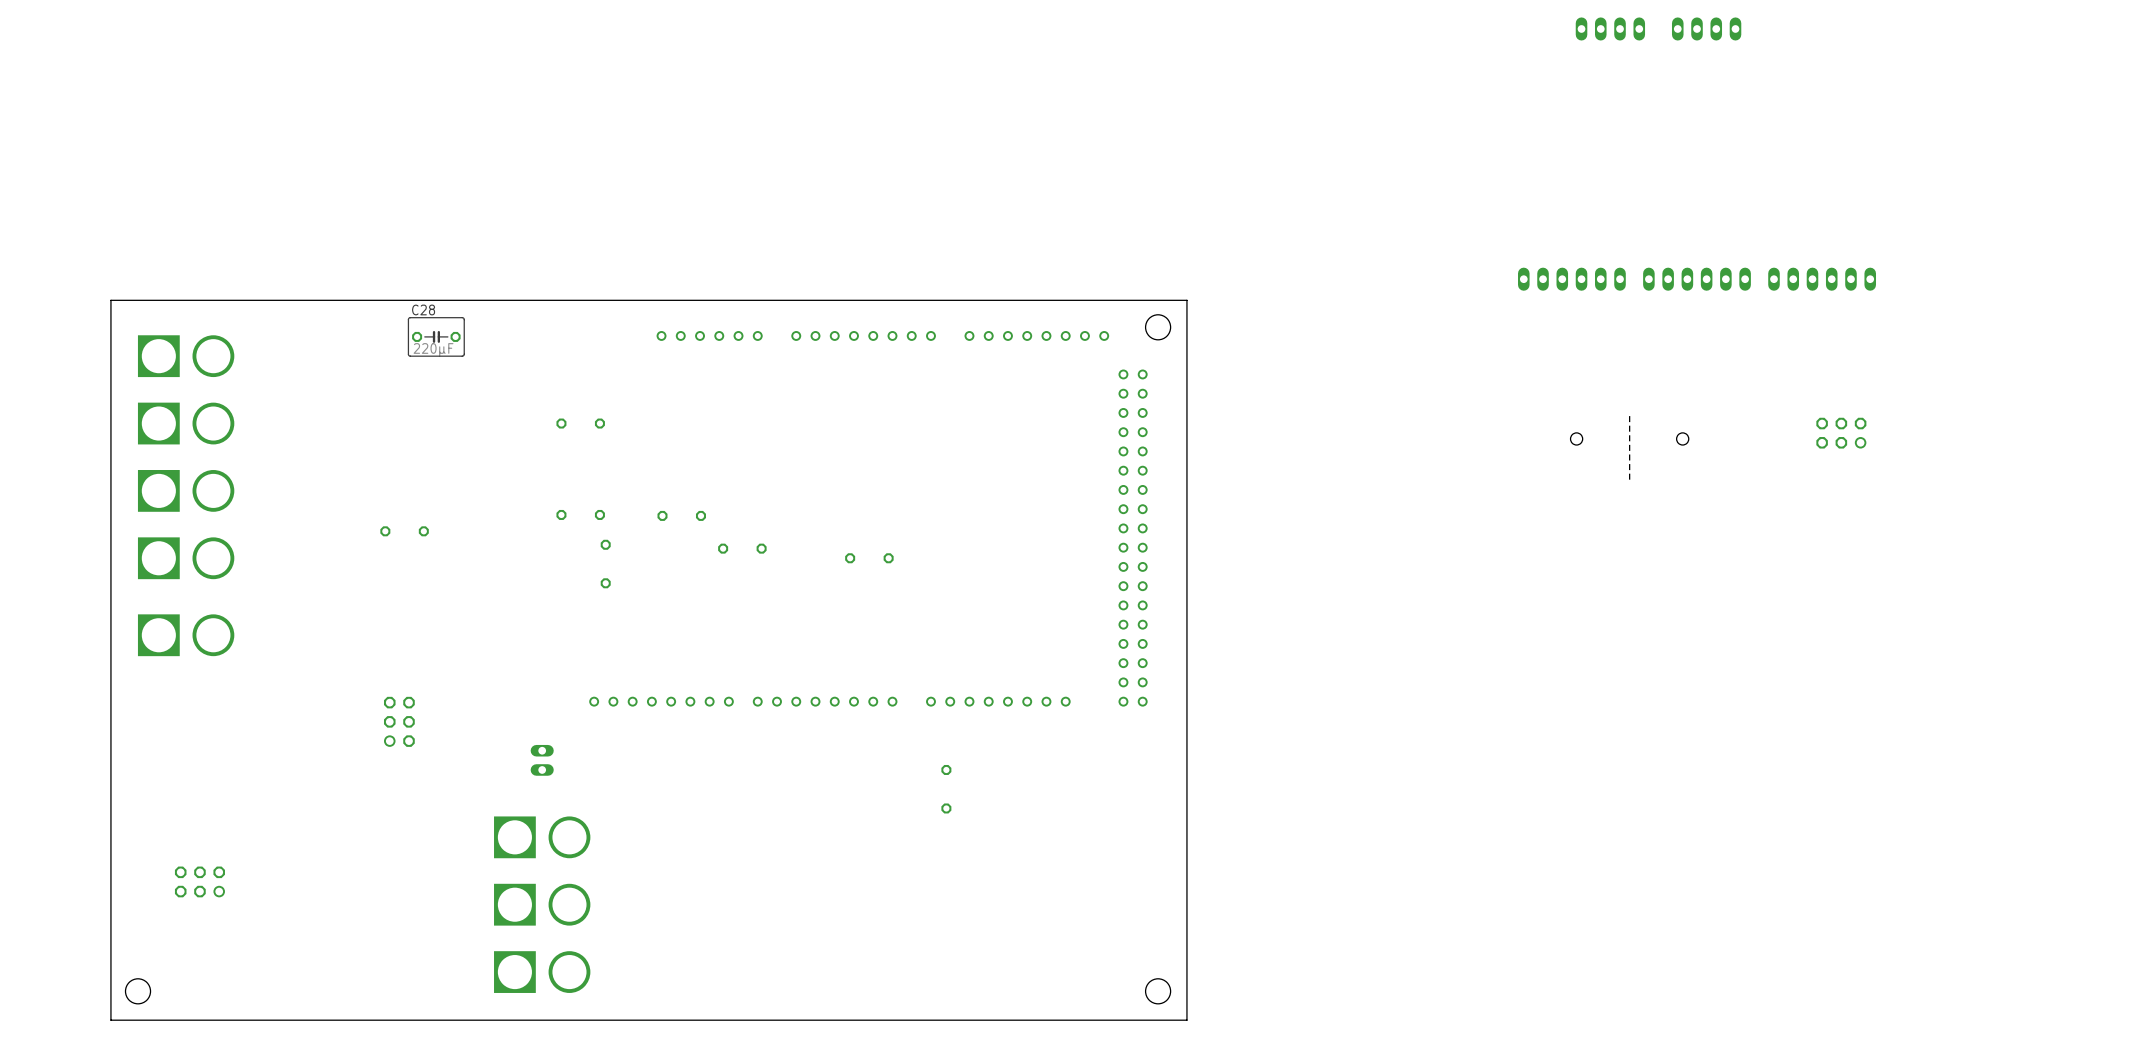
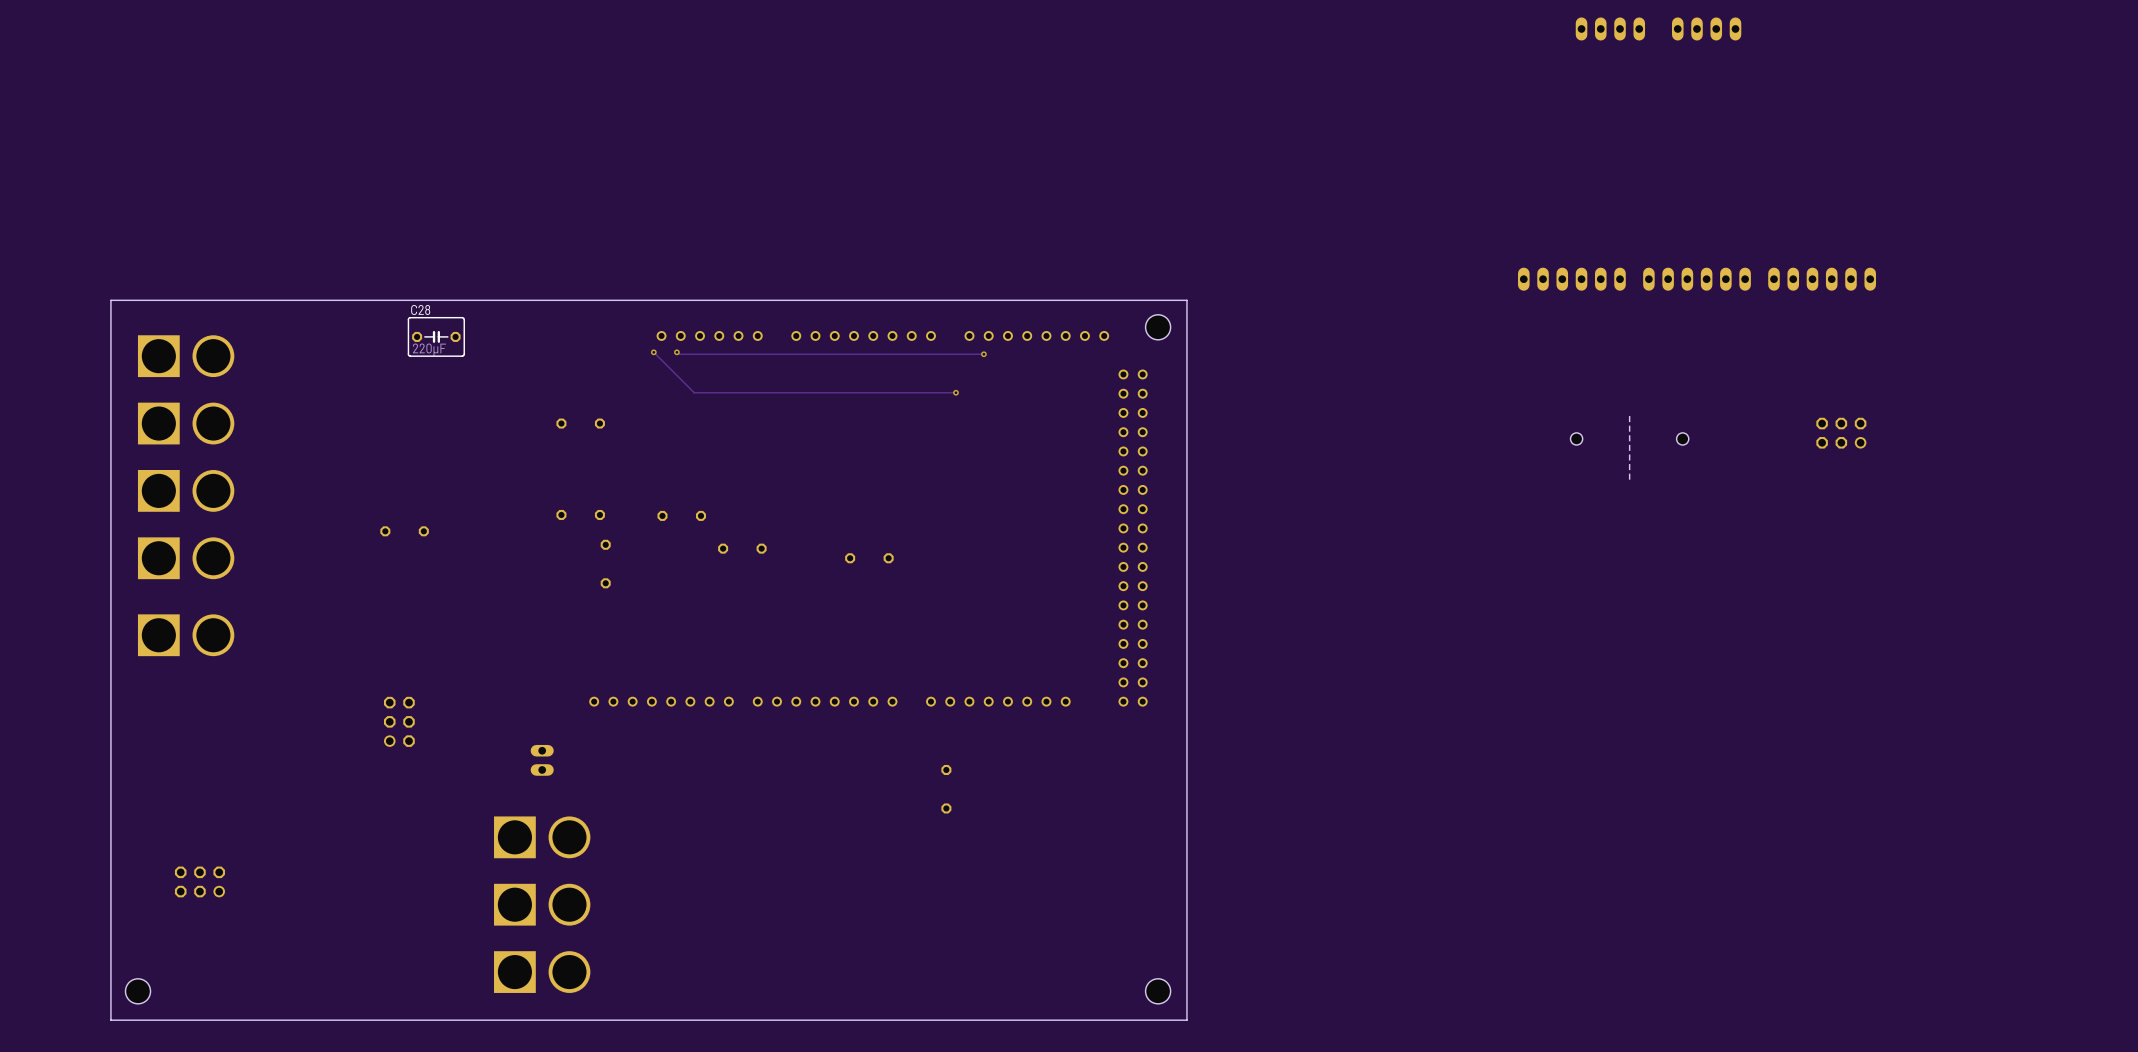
track: none -> (653, 352) (694, 392) (956, 392)
via: none -> (653, 352)
track: none -> (676, 352) (678, 354) (983, 354)
via: none -> (676, 352)
via: none -> (983, 354)
via: none -> (956, 392)

